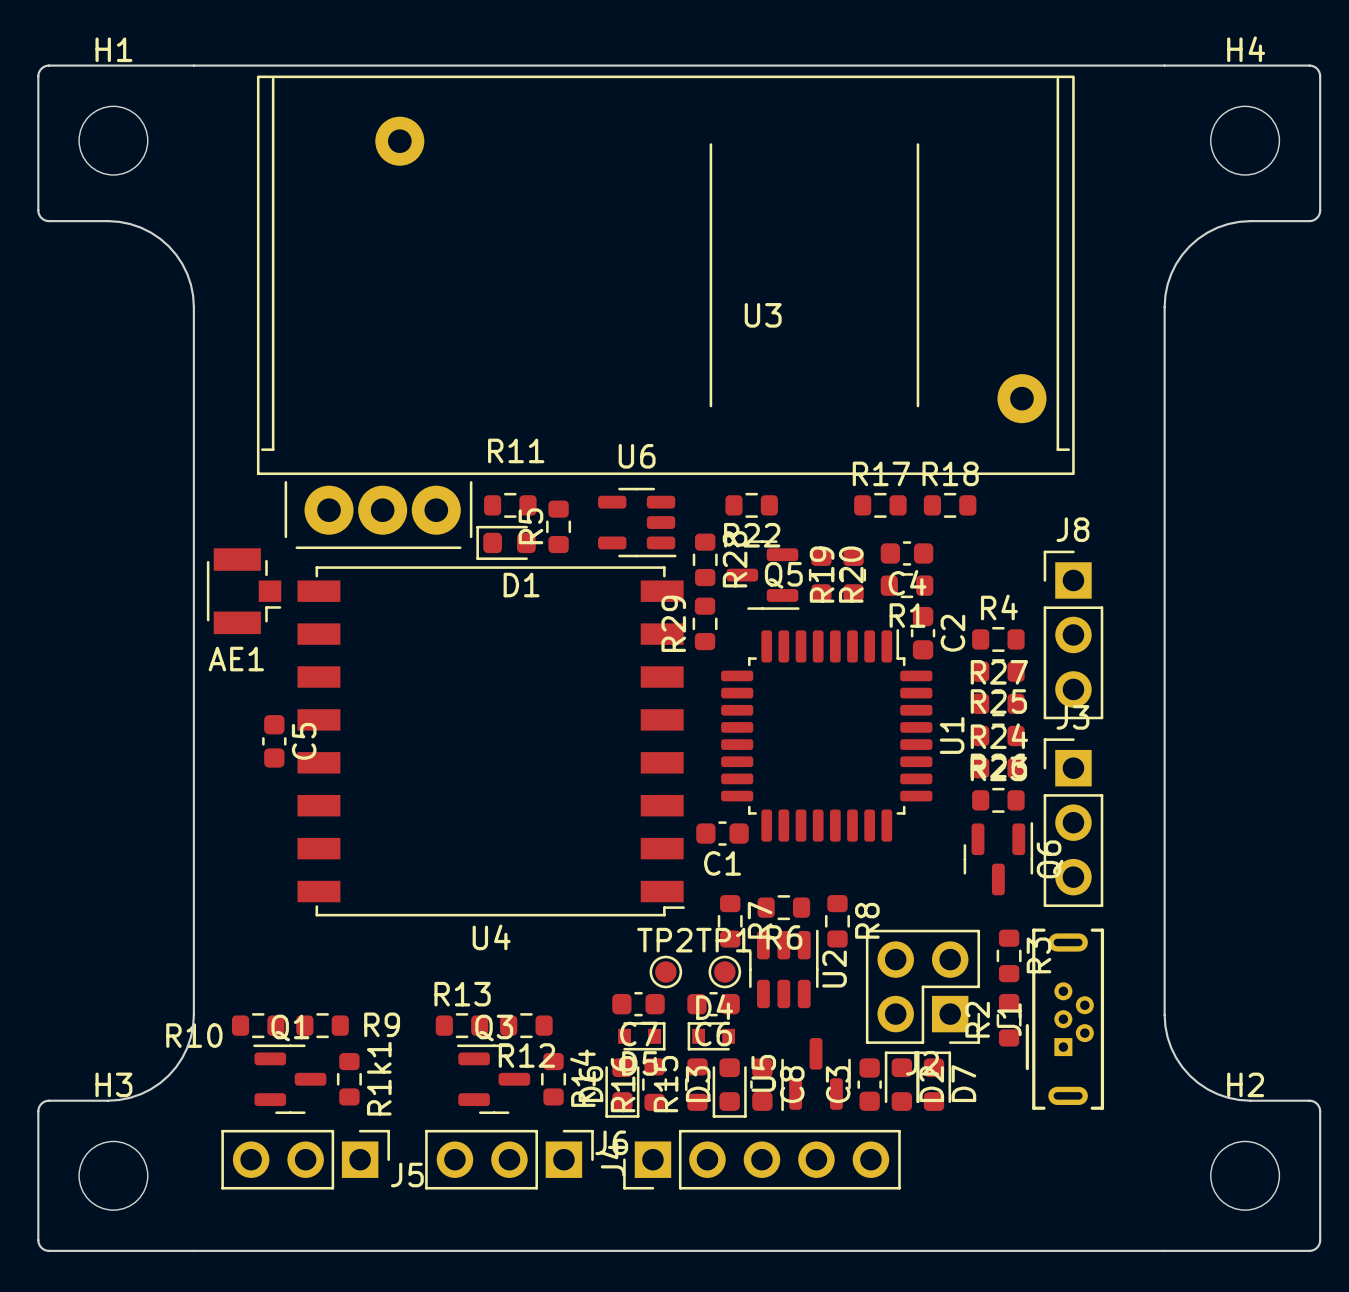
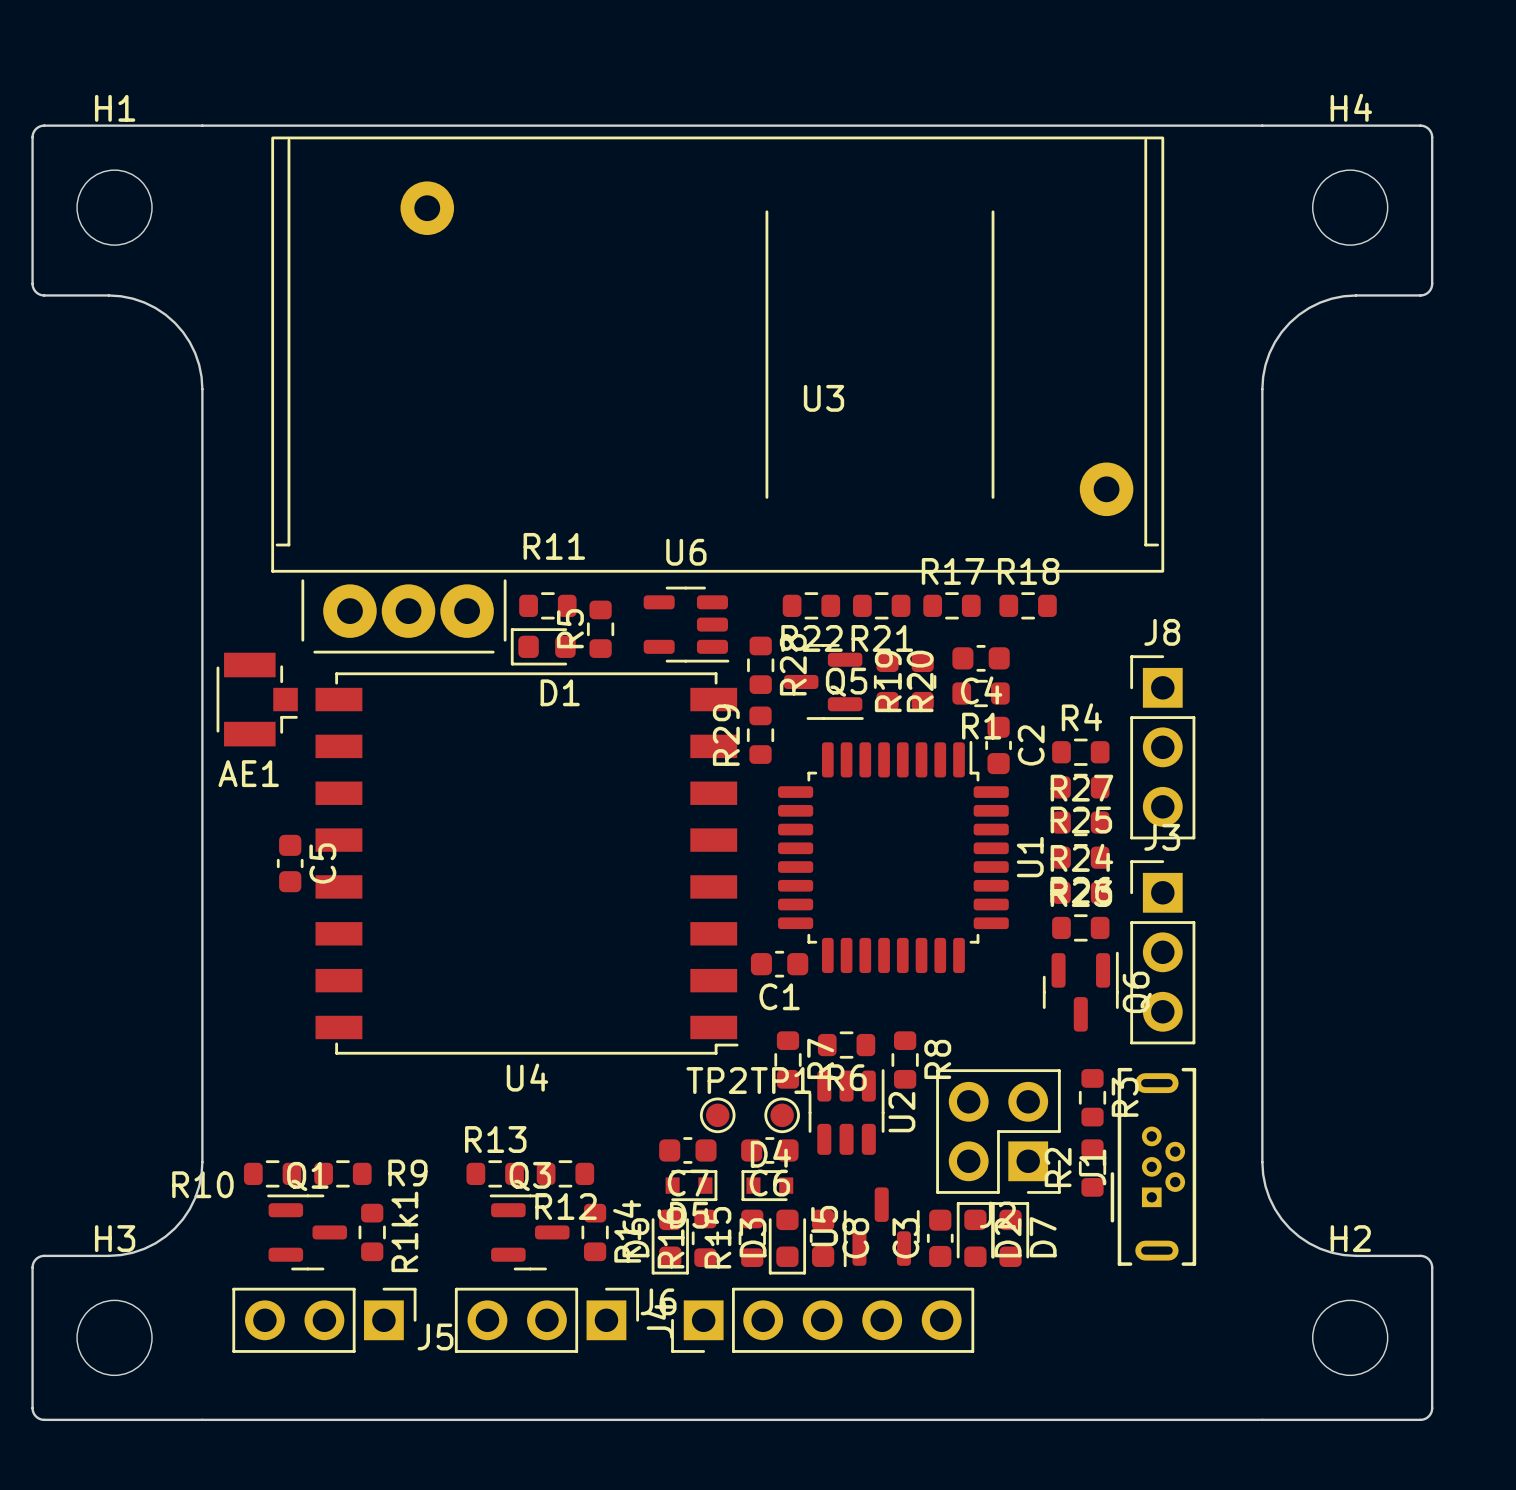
R21: none -> (881, 605)

